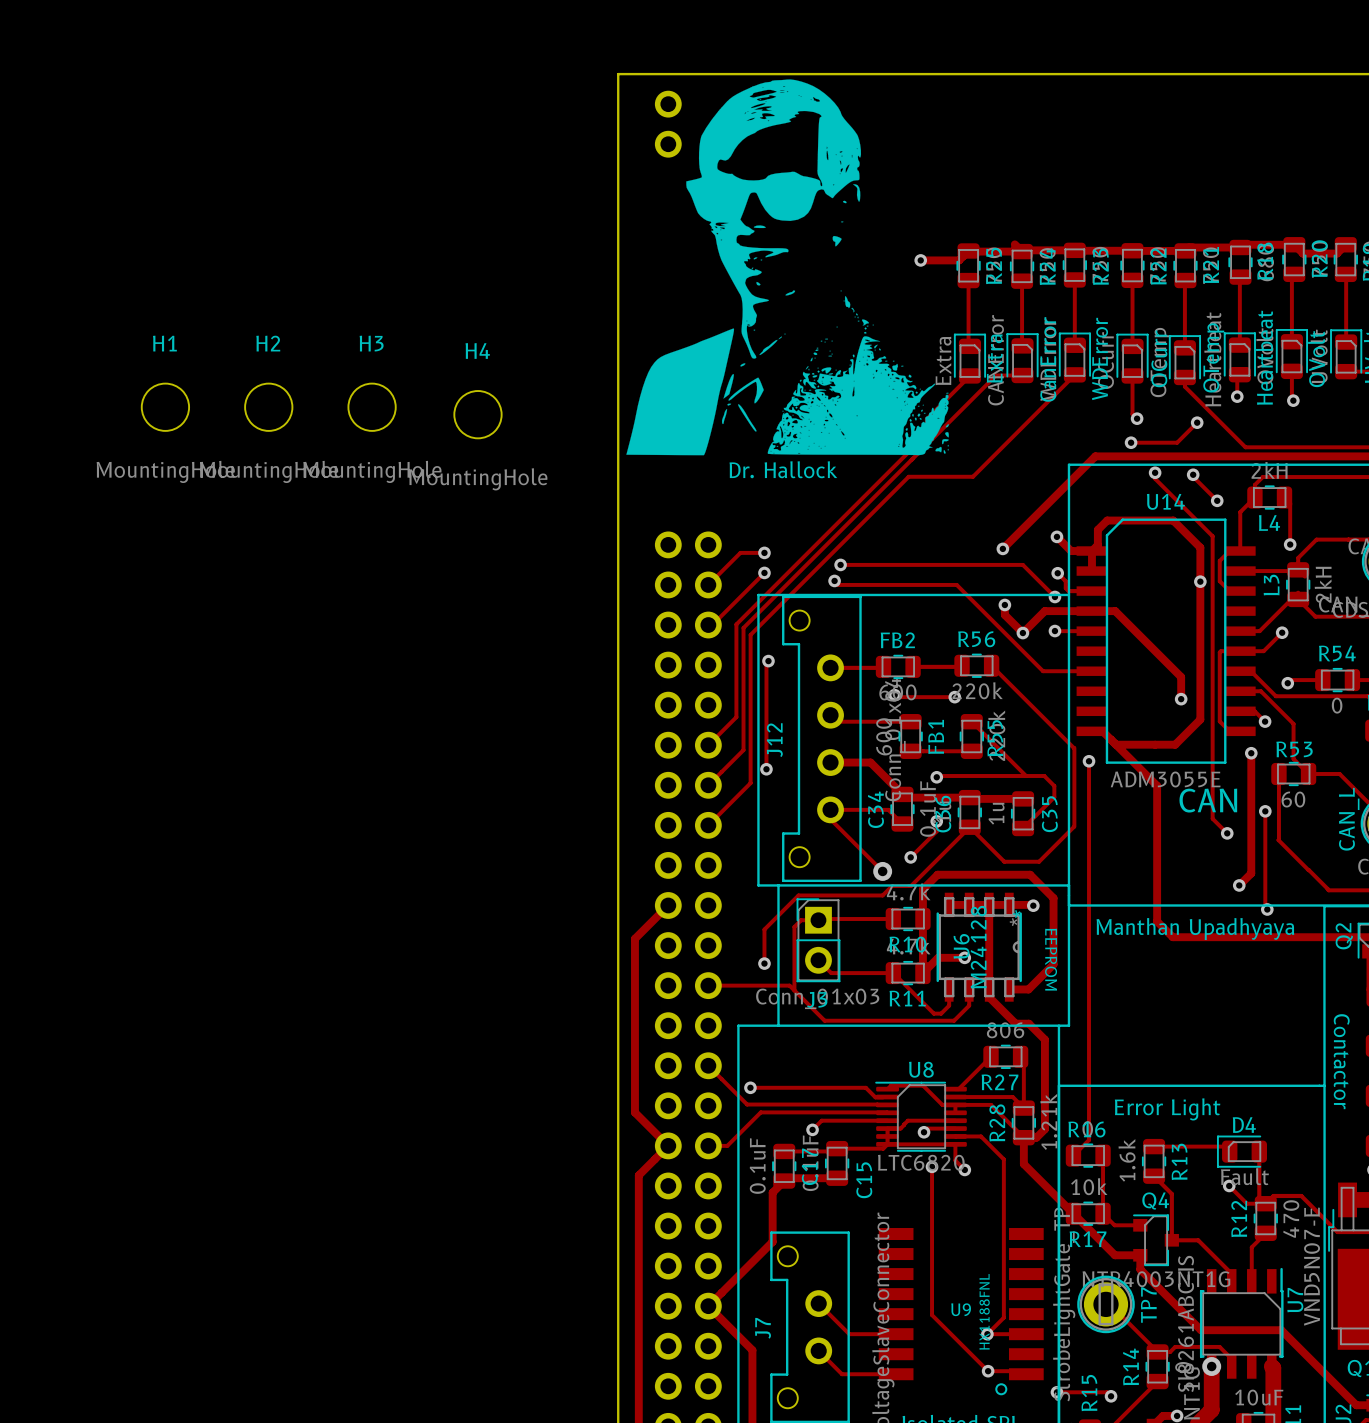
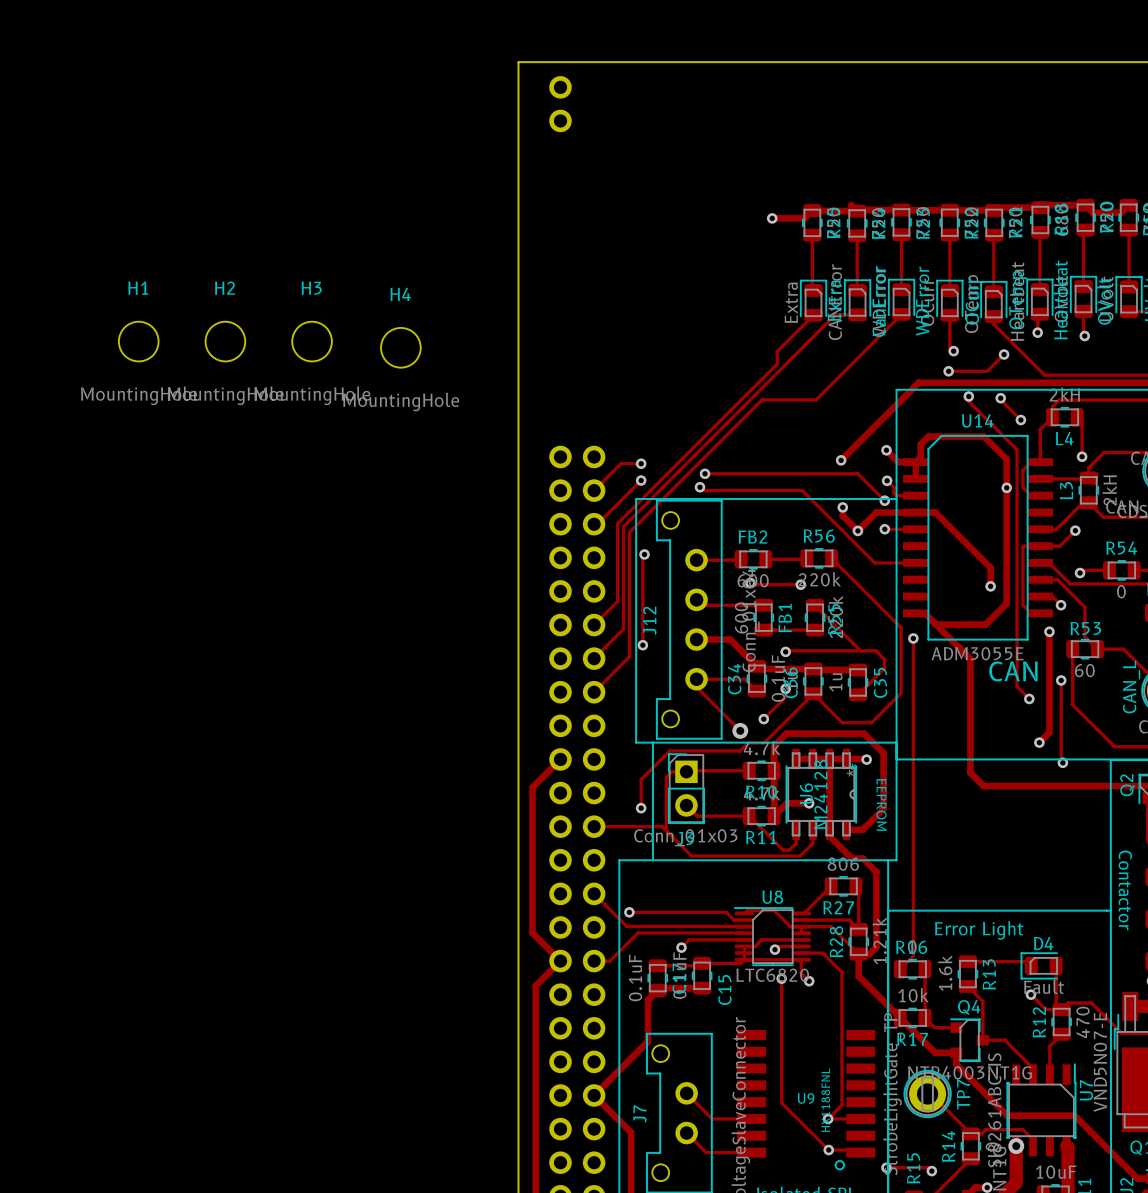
drawing: [626, 79, 949, 456] -> none
text: Dr. Hallock (783, 469) -> none
text: Manthan Upadhyaya (1195, 929) -> none

